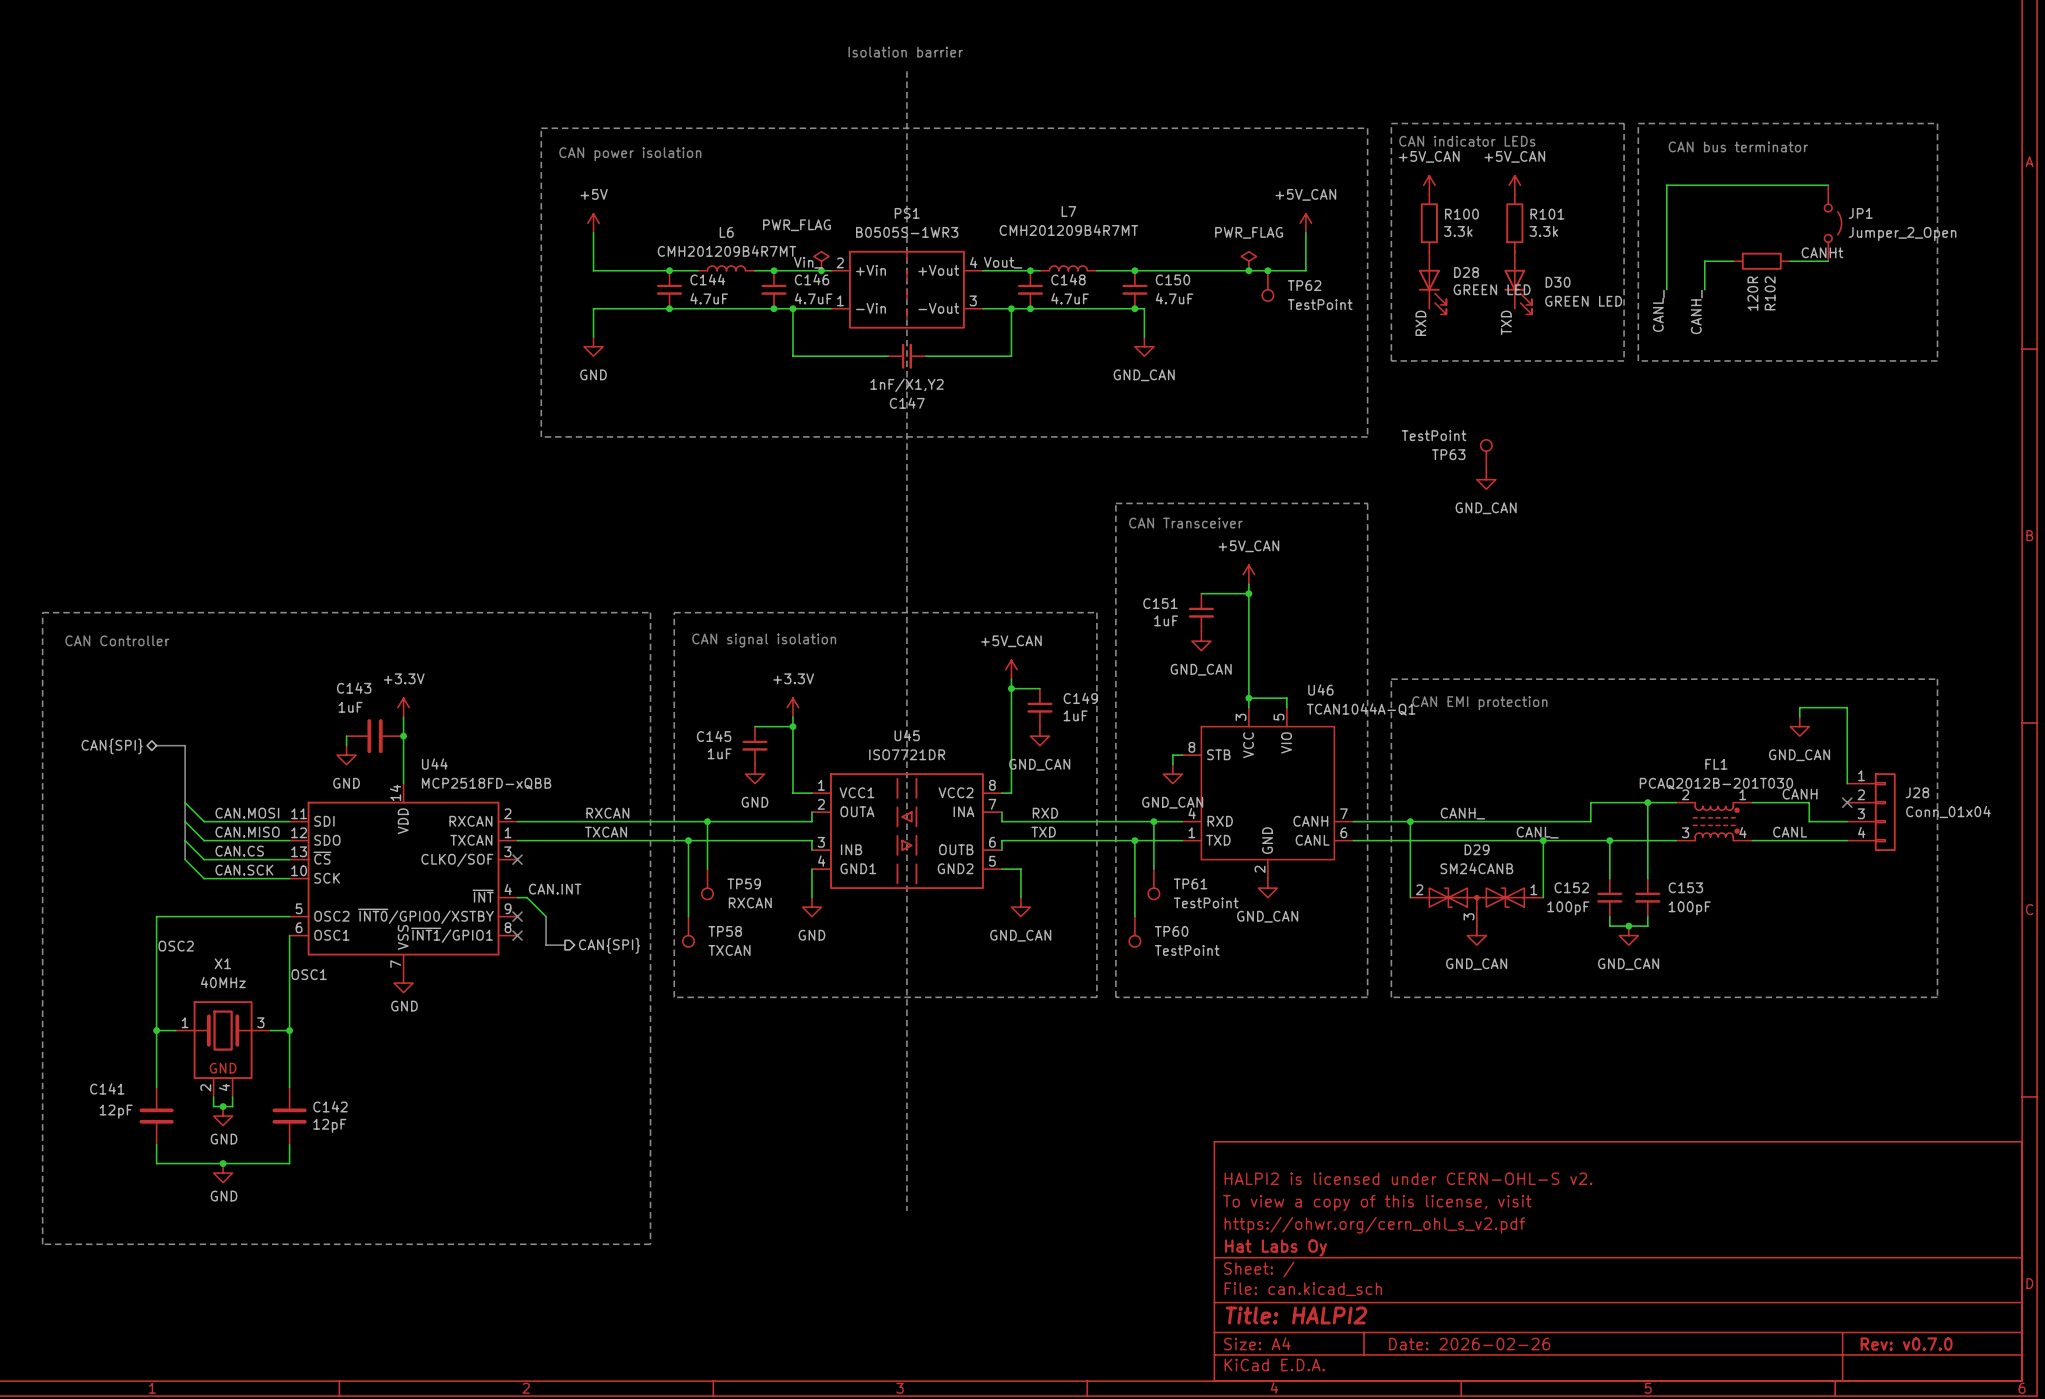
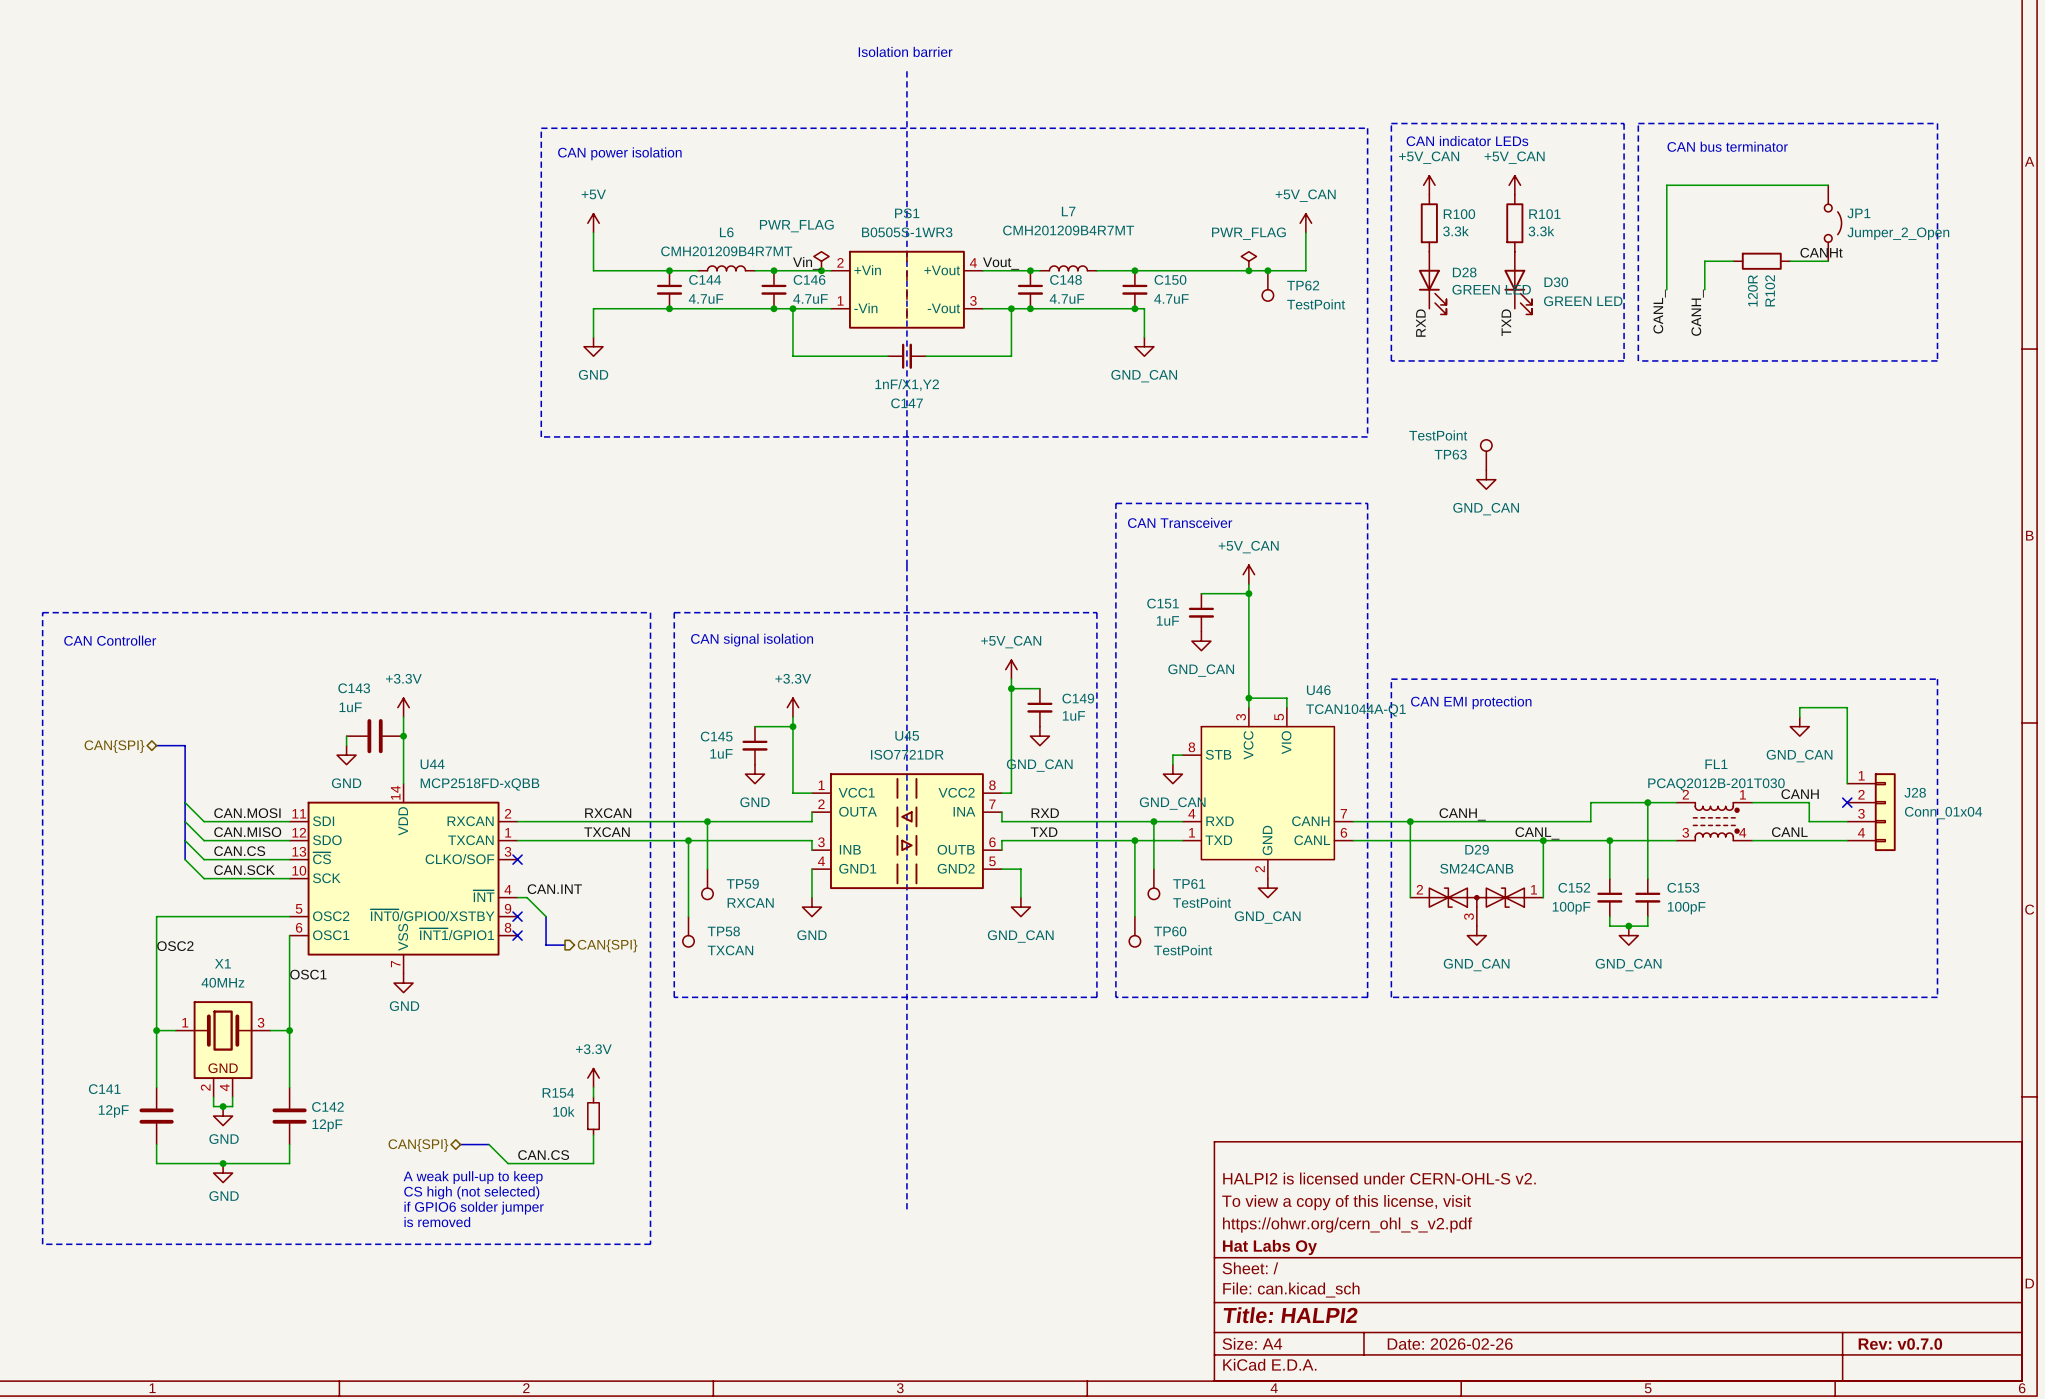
power symbol: none -> +3.3V (593, 1078)
wire: none -> (593, 1087) (593, 1097)
R154: none -> 10k (593, 1116)
wire: none -> (593, 1135) (593, 1163) (508, 1163) (489, 1144)
bus: none -> (460, 1144) (489, 1144)
hierarchical label: none -> CAN{SPI} (418, 1145)
label: none -> CAN.CS (543, 1155)
text: none -> A weak pull-up to keep (473, 1177)
text: none -> CS high (not selected) (471, 1192)
text: none -> if GPIO6 solder jumper (474, 1208)
text: none -> is removed (437, 1222)

